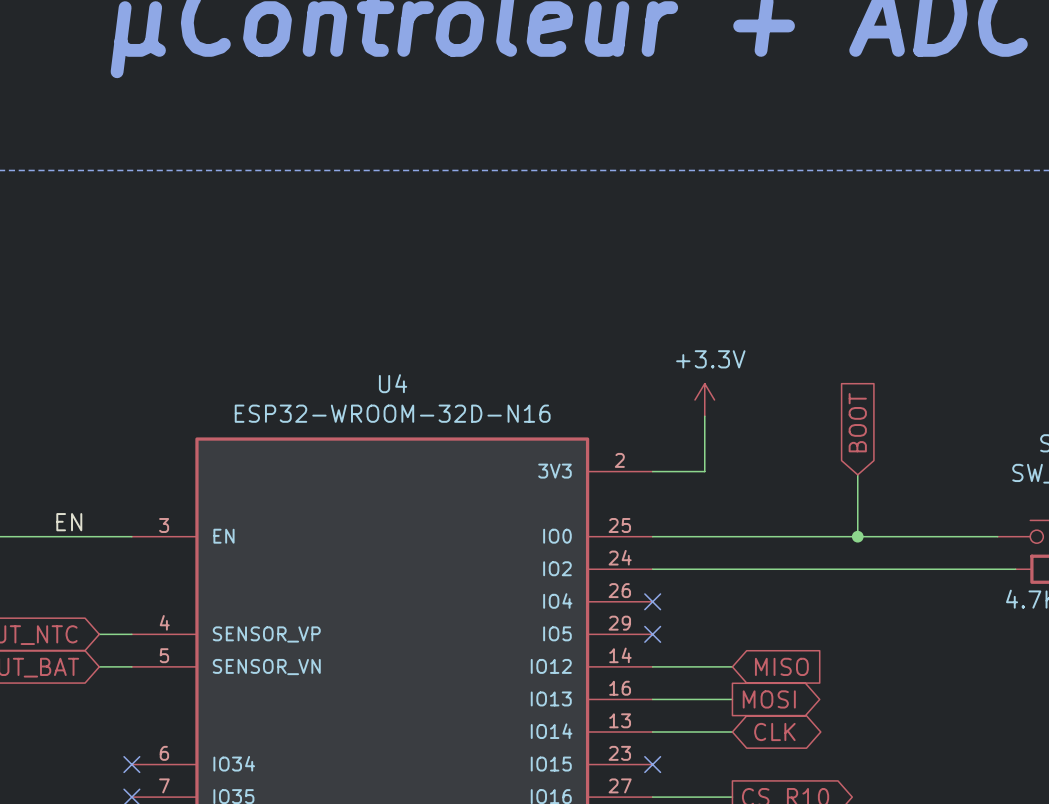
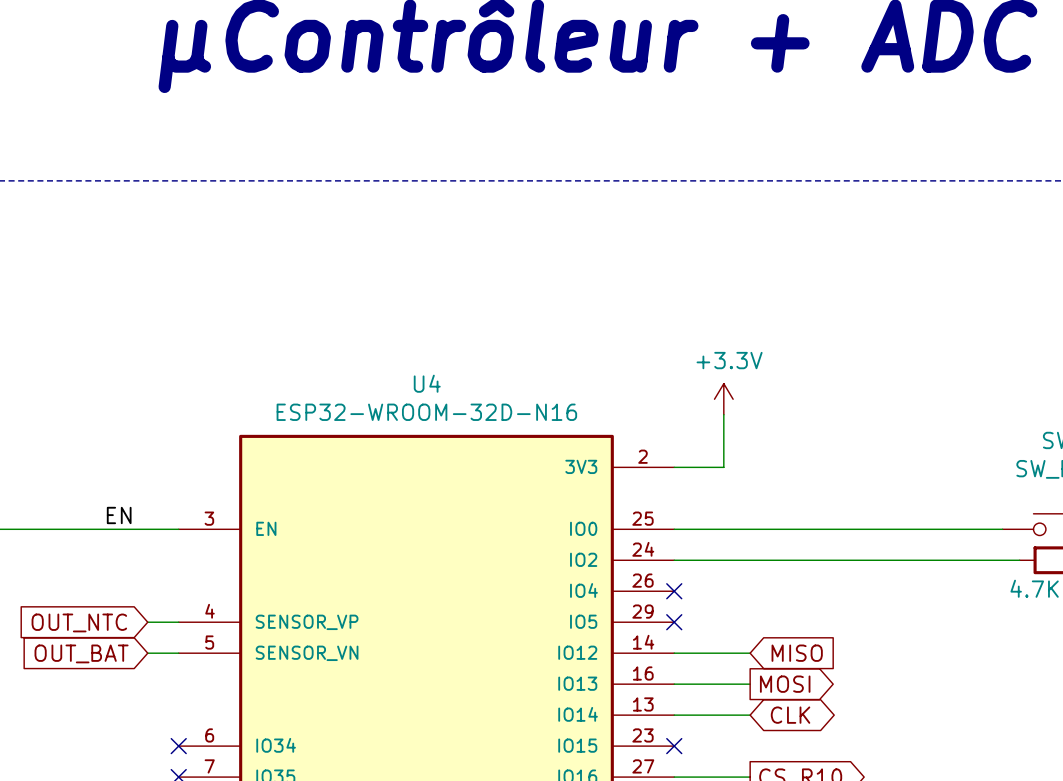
global label: BOOT (857, 422) -> none
wire: (857, 474) (857, 536) -> none
junction: (857, 536) -> none

